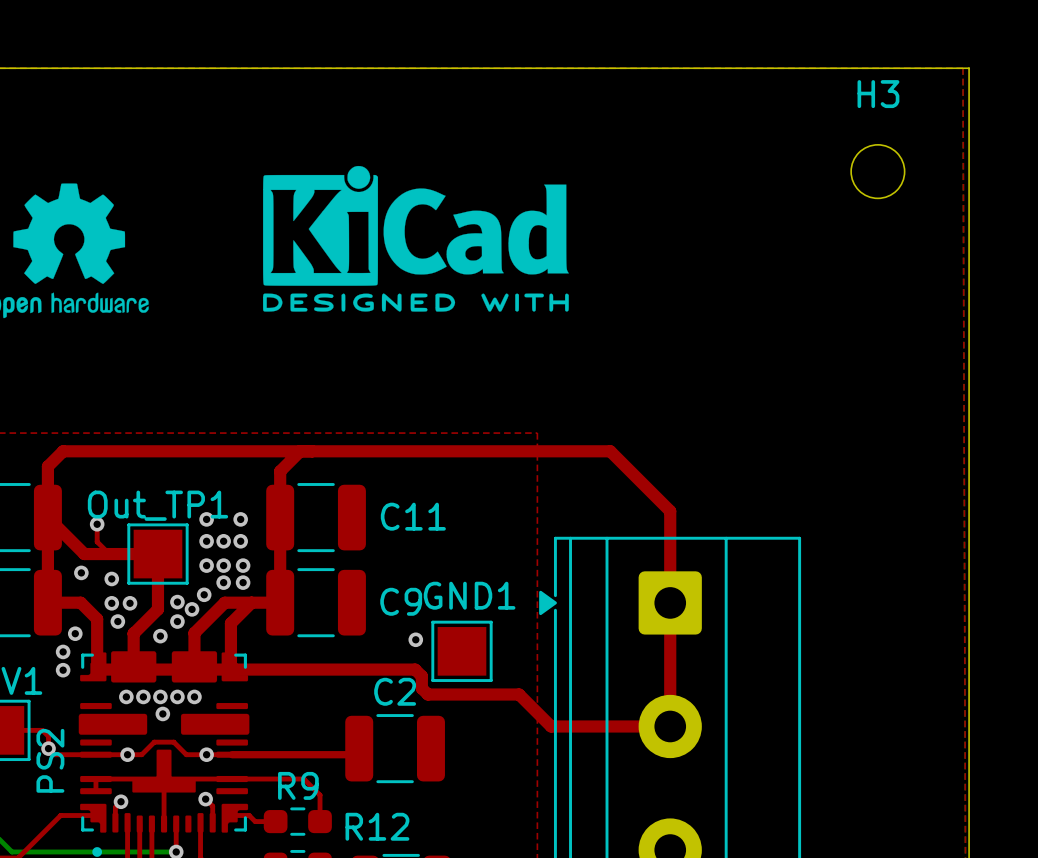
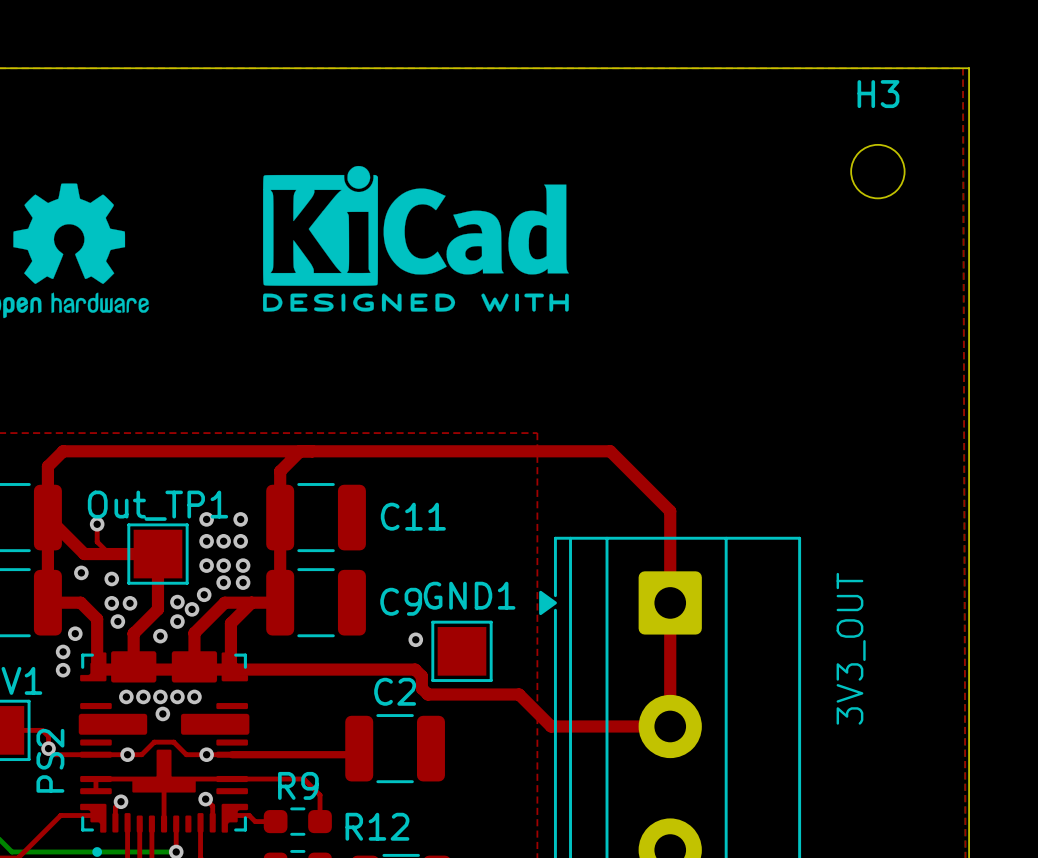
text: none -> 3V3_OUT (851, 648)

